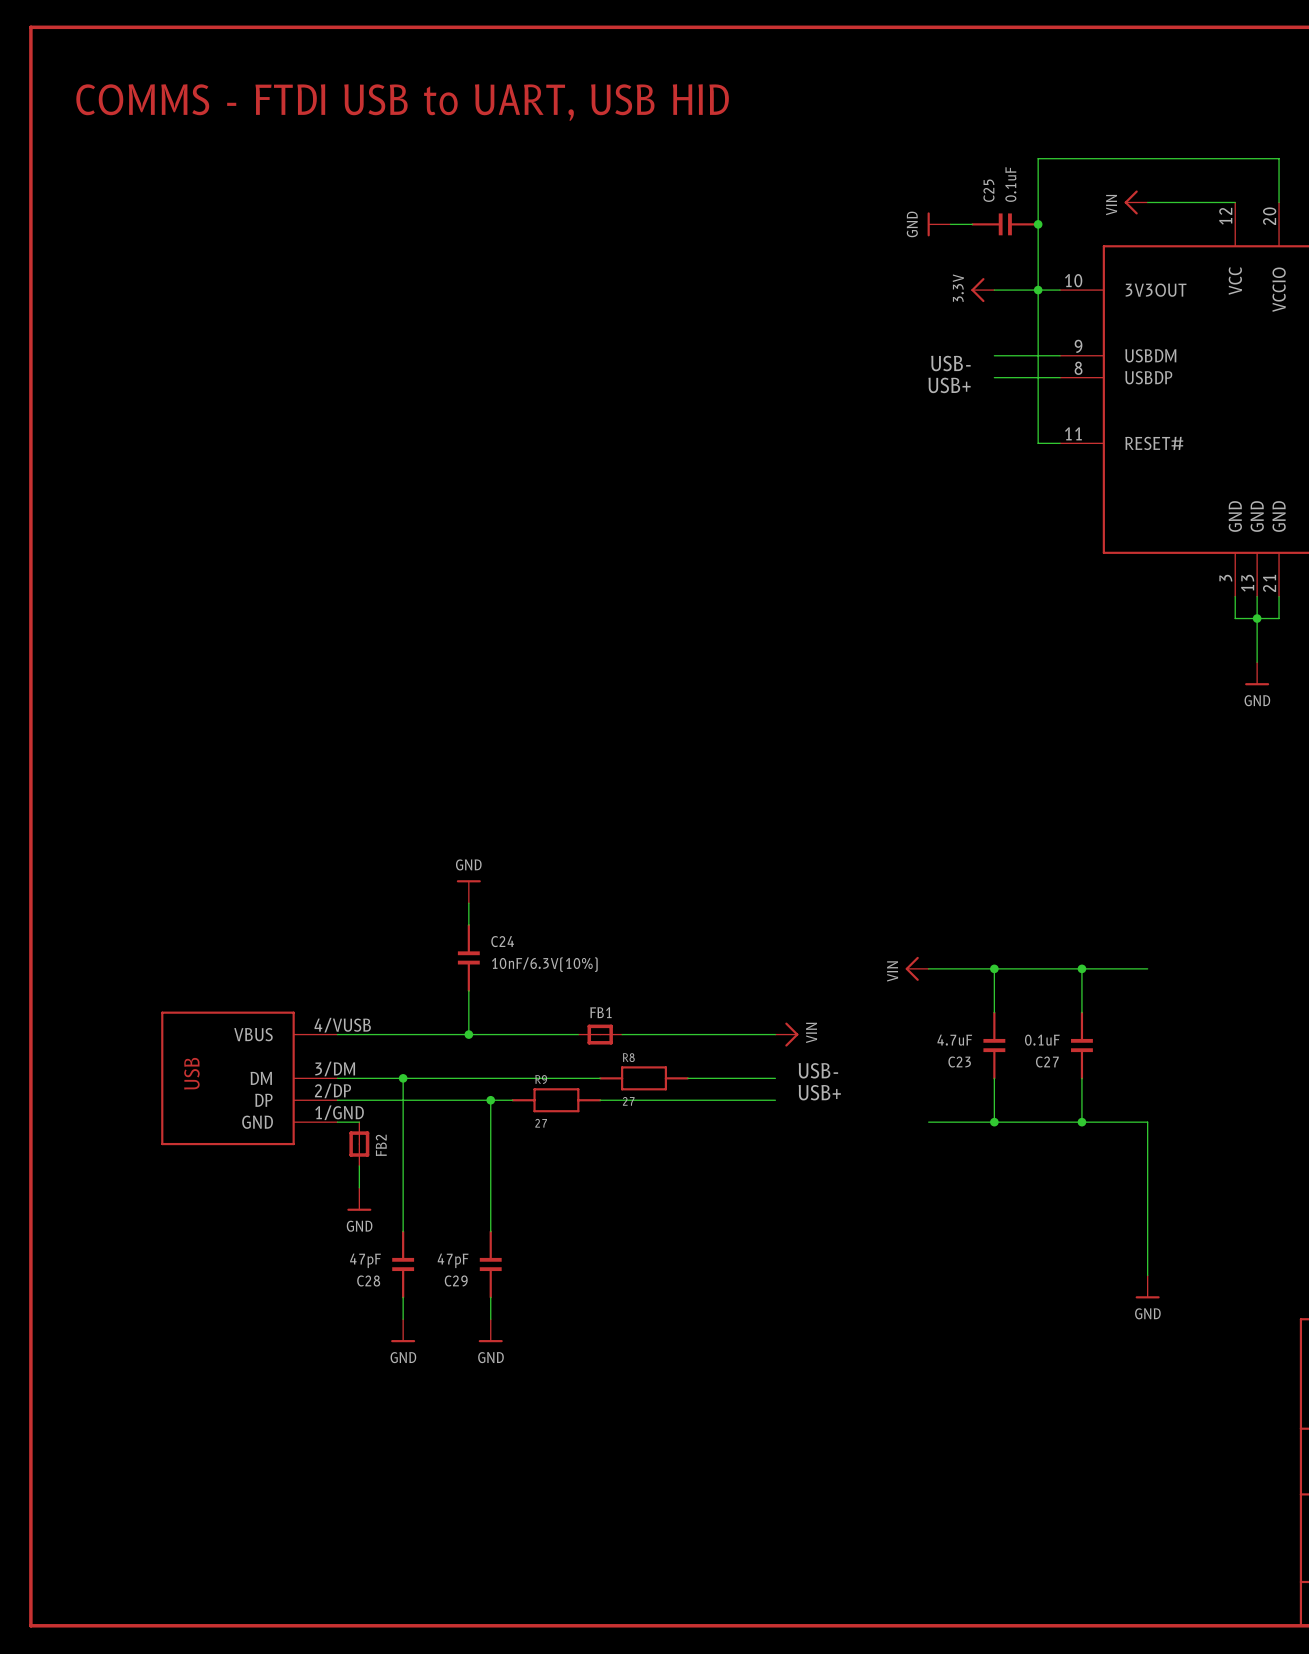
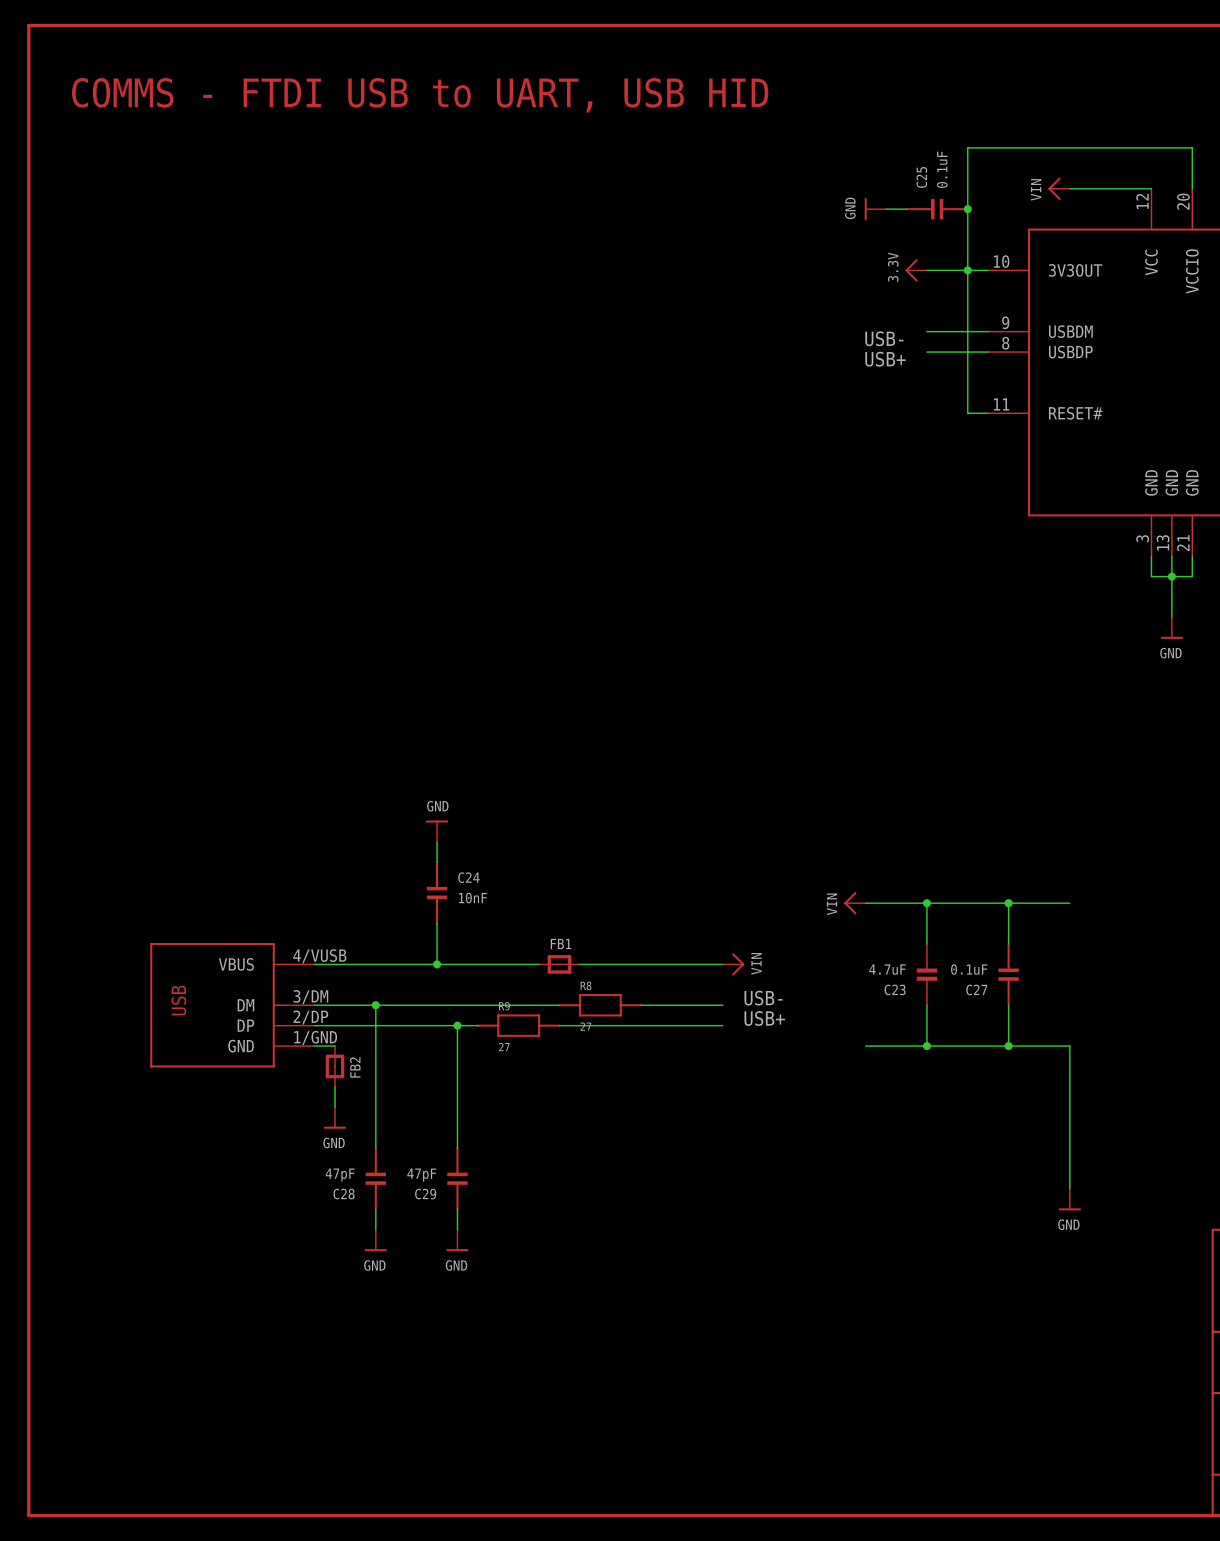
C24 value: 10nF/6.3V(10%) (544, 964) -> 10nF (473, 898)
C23 symbol: [983, 1011, 1006, 1080] -> [916, 944, 938, 1006]

